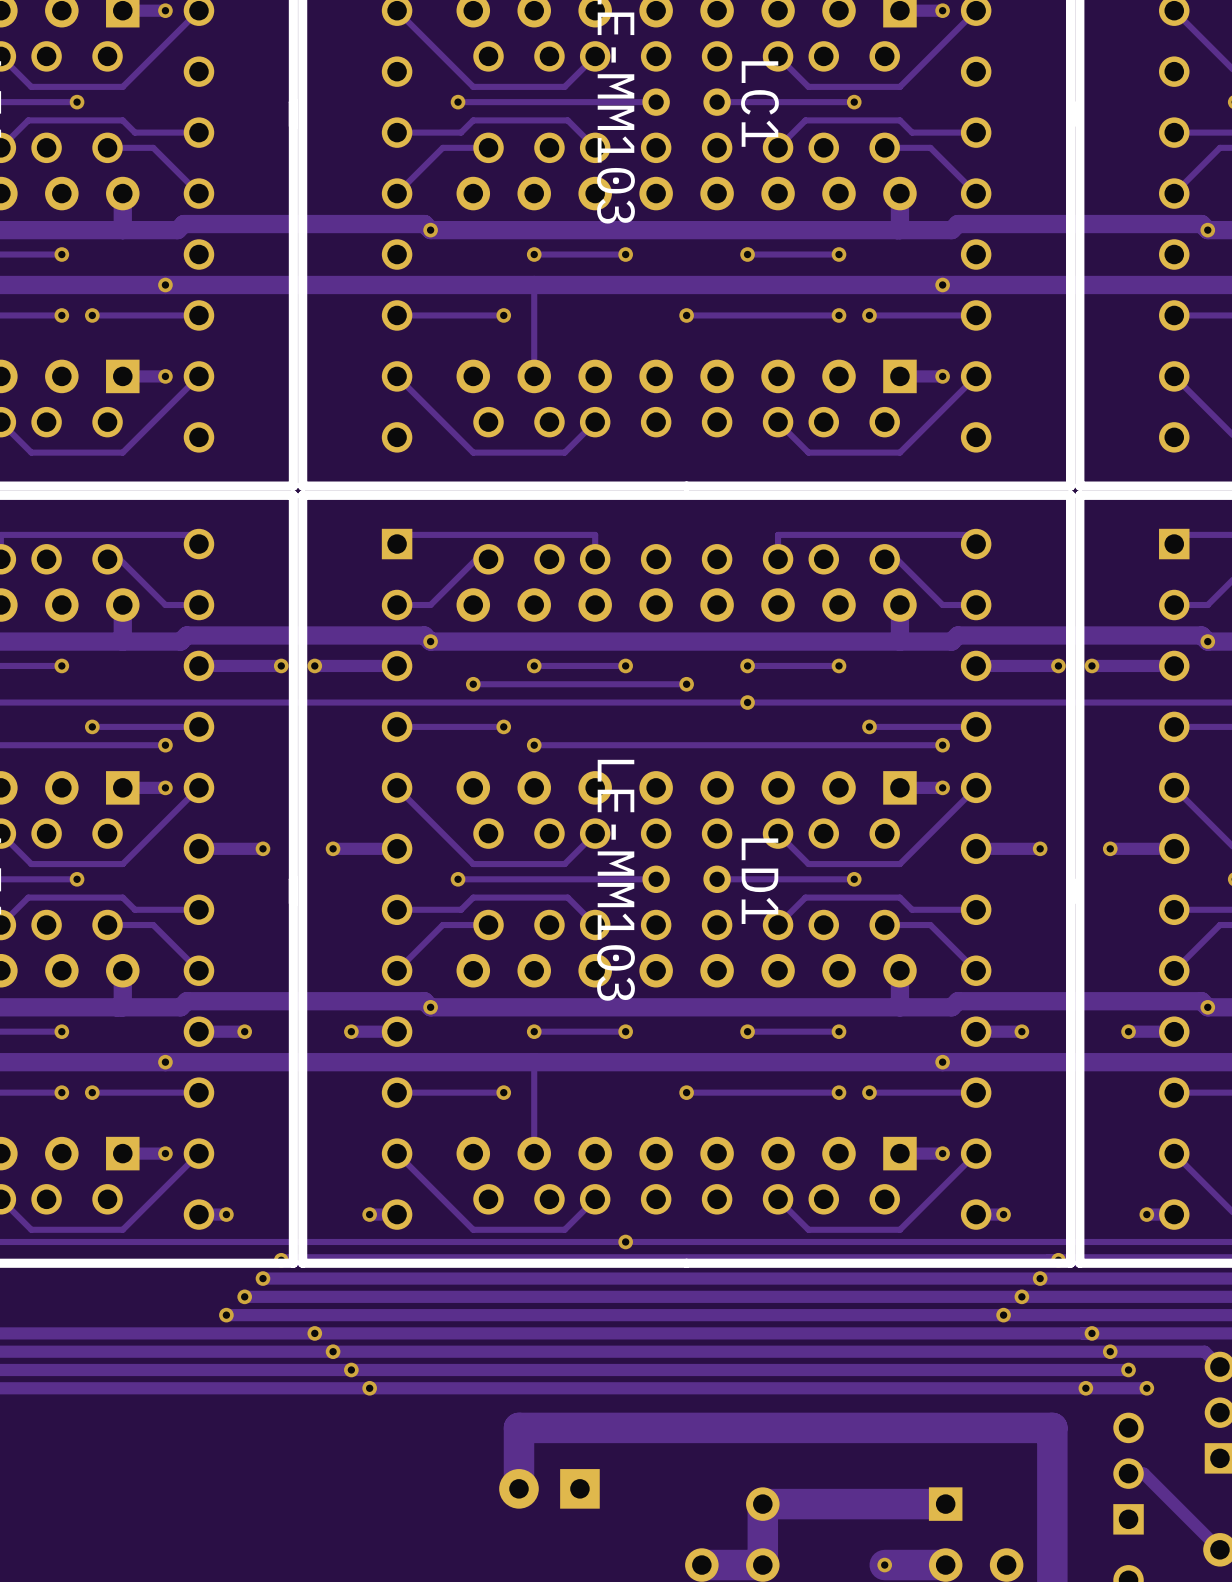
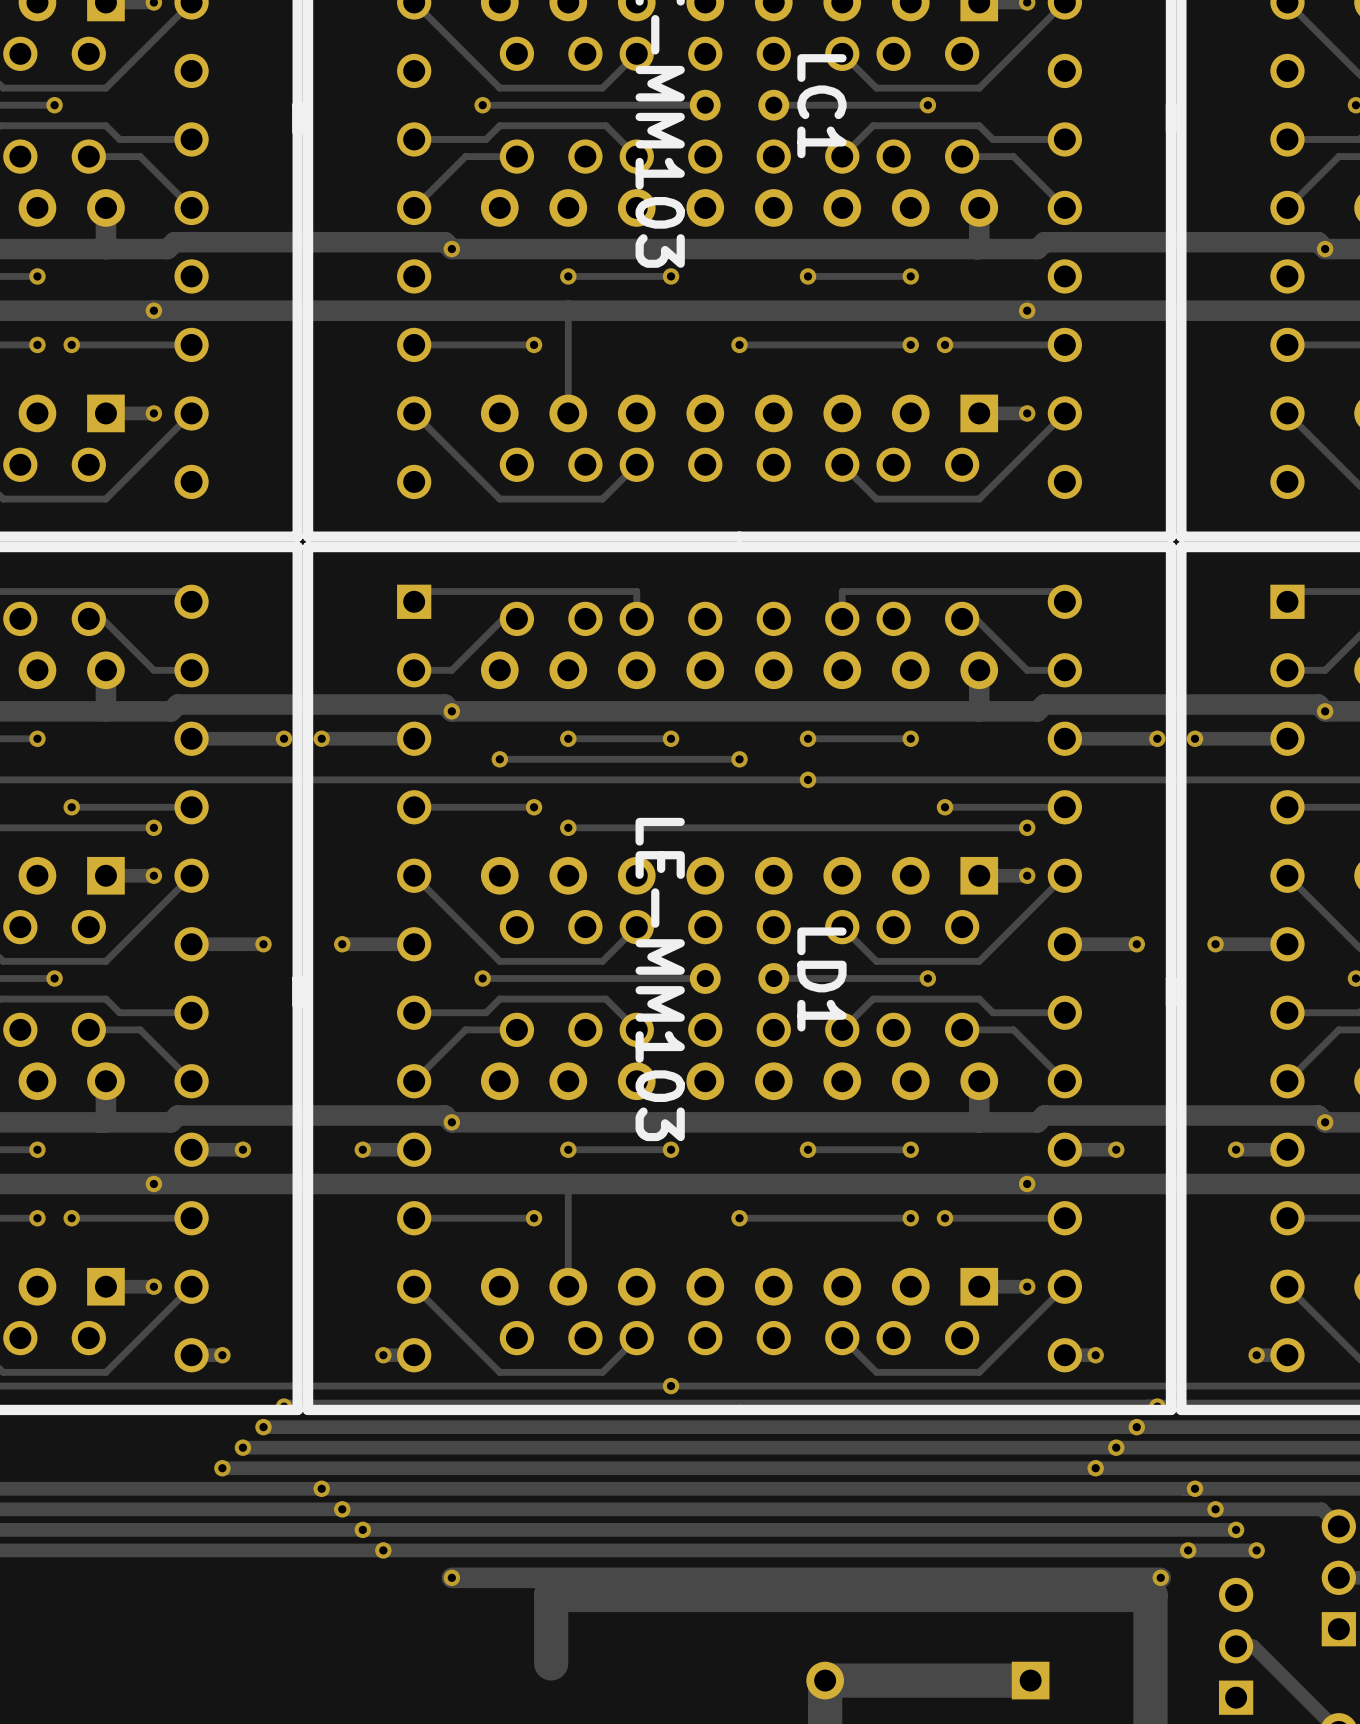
via: none -> (451, 1577)
track: none -> (1160, 1577) (451, 1577)
via: none -> (1160, 1577)
part: (549, 1488) -> none

